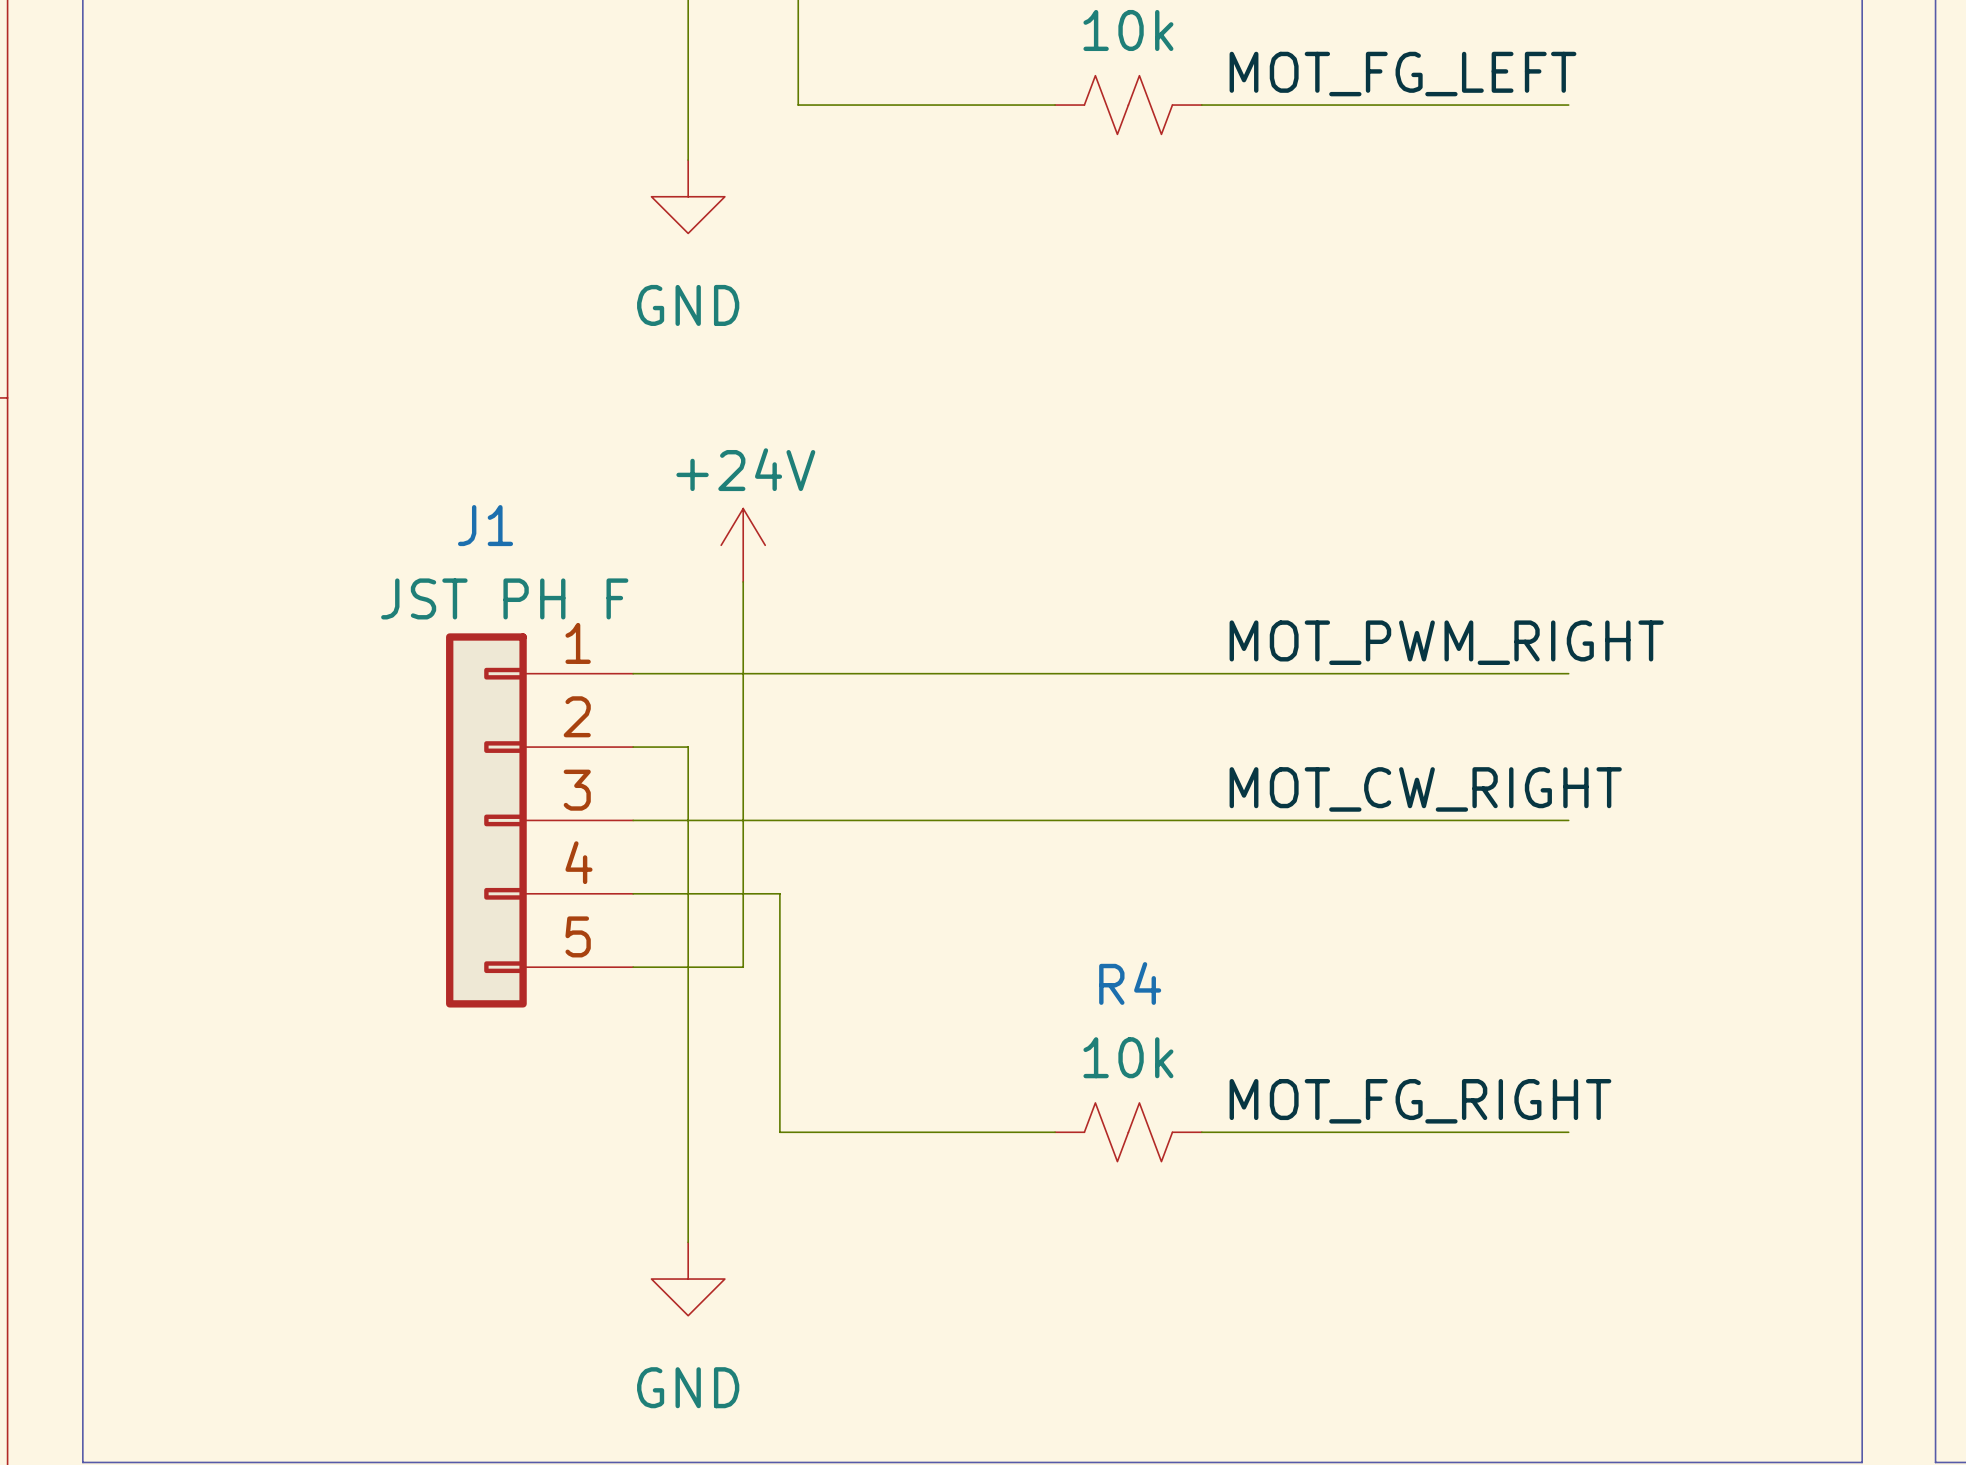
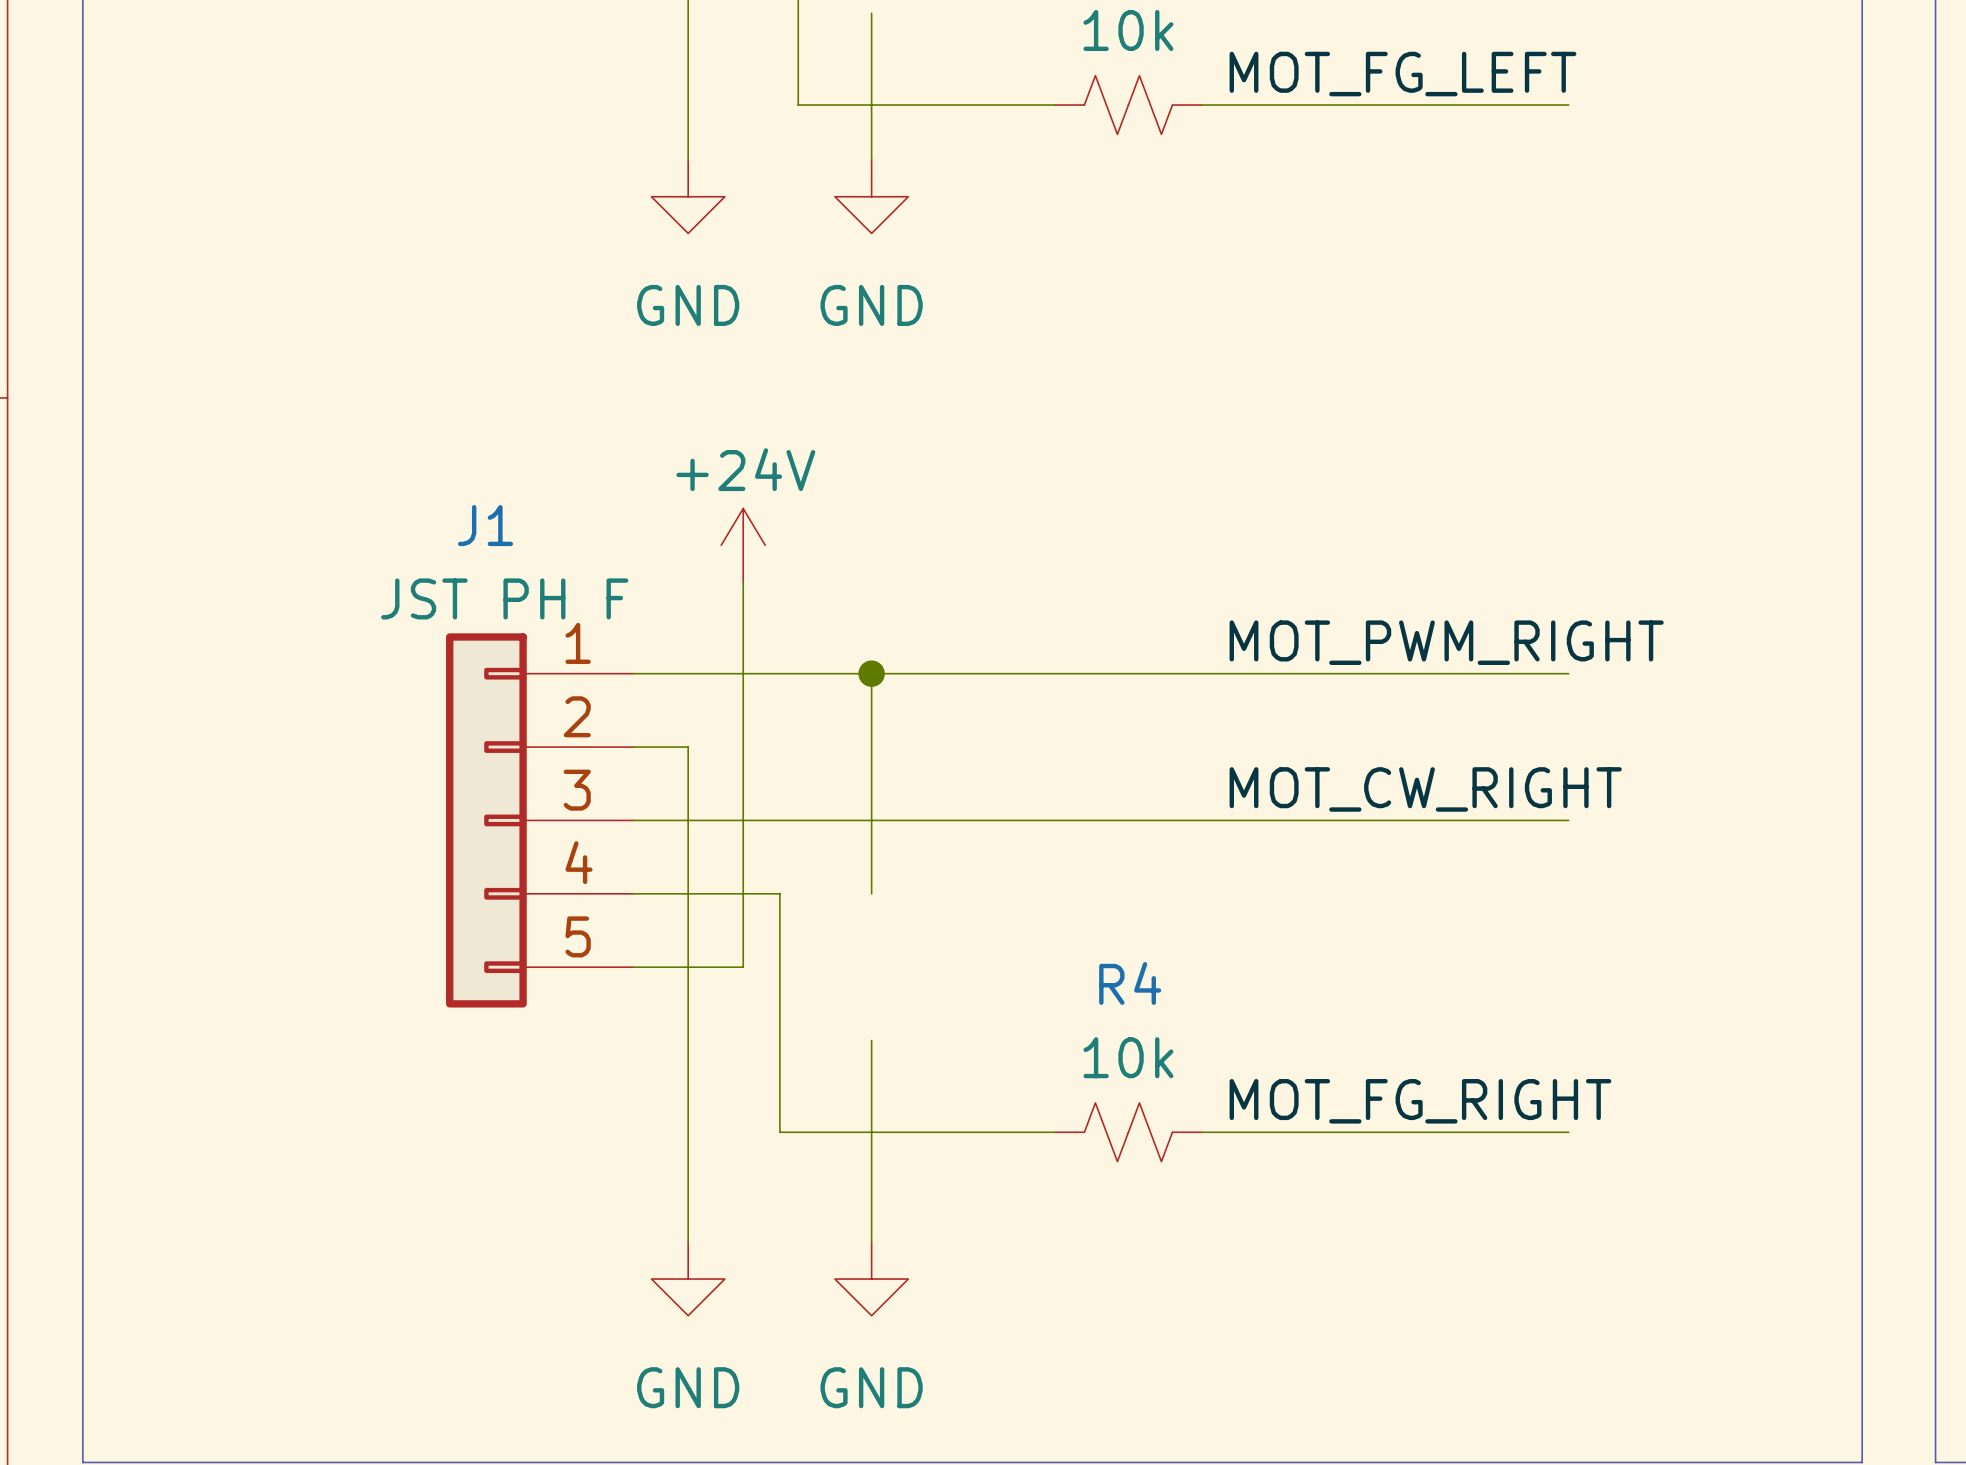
wire: none -> (871, 13) (871, 160)
power symbol: none -> GND (871, 196)
wire: none -> (871, 673) (871, 893)
junction: none -> (871, 673)
wire: none -> (871, 1040) (871, 1242)
power symbol: none -> GND (871, 1279)

